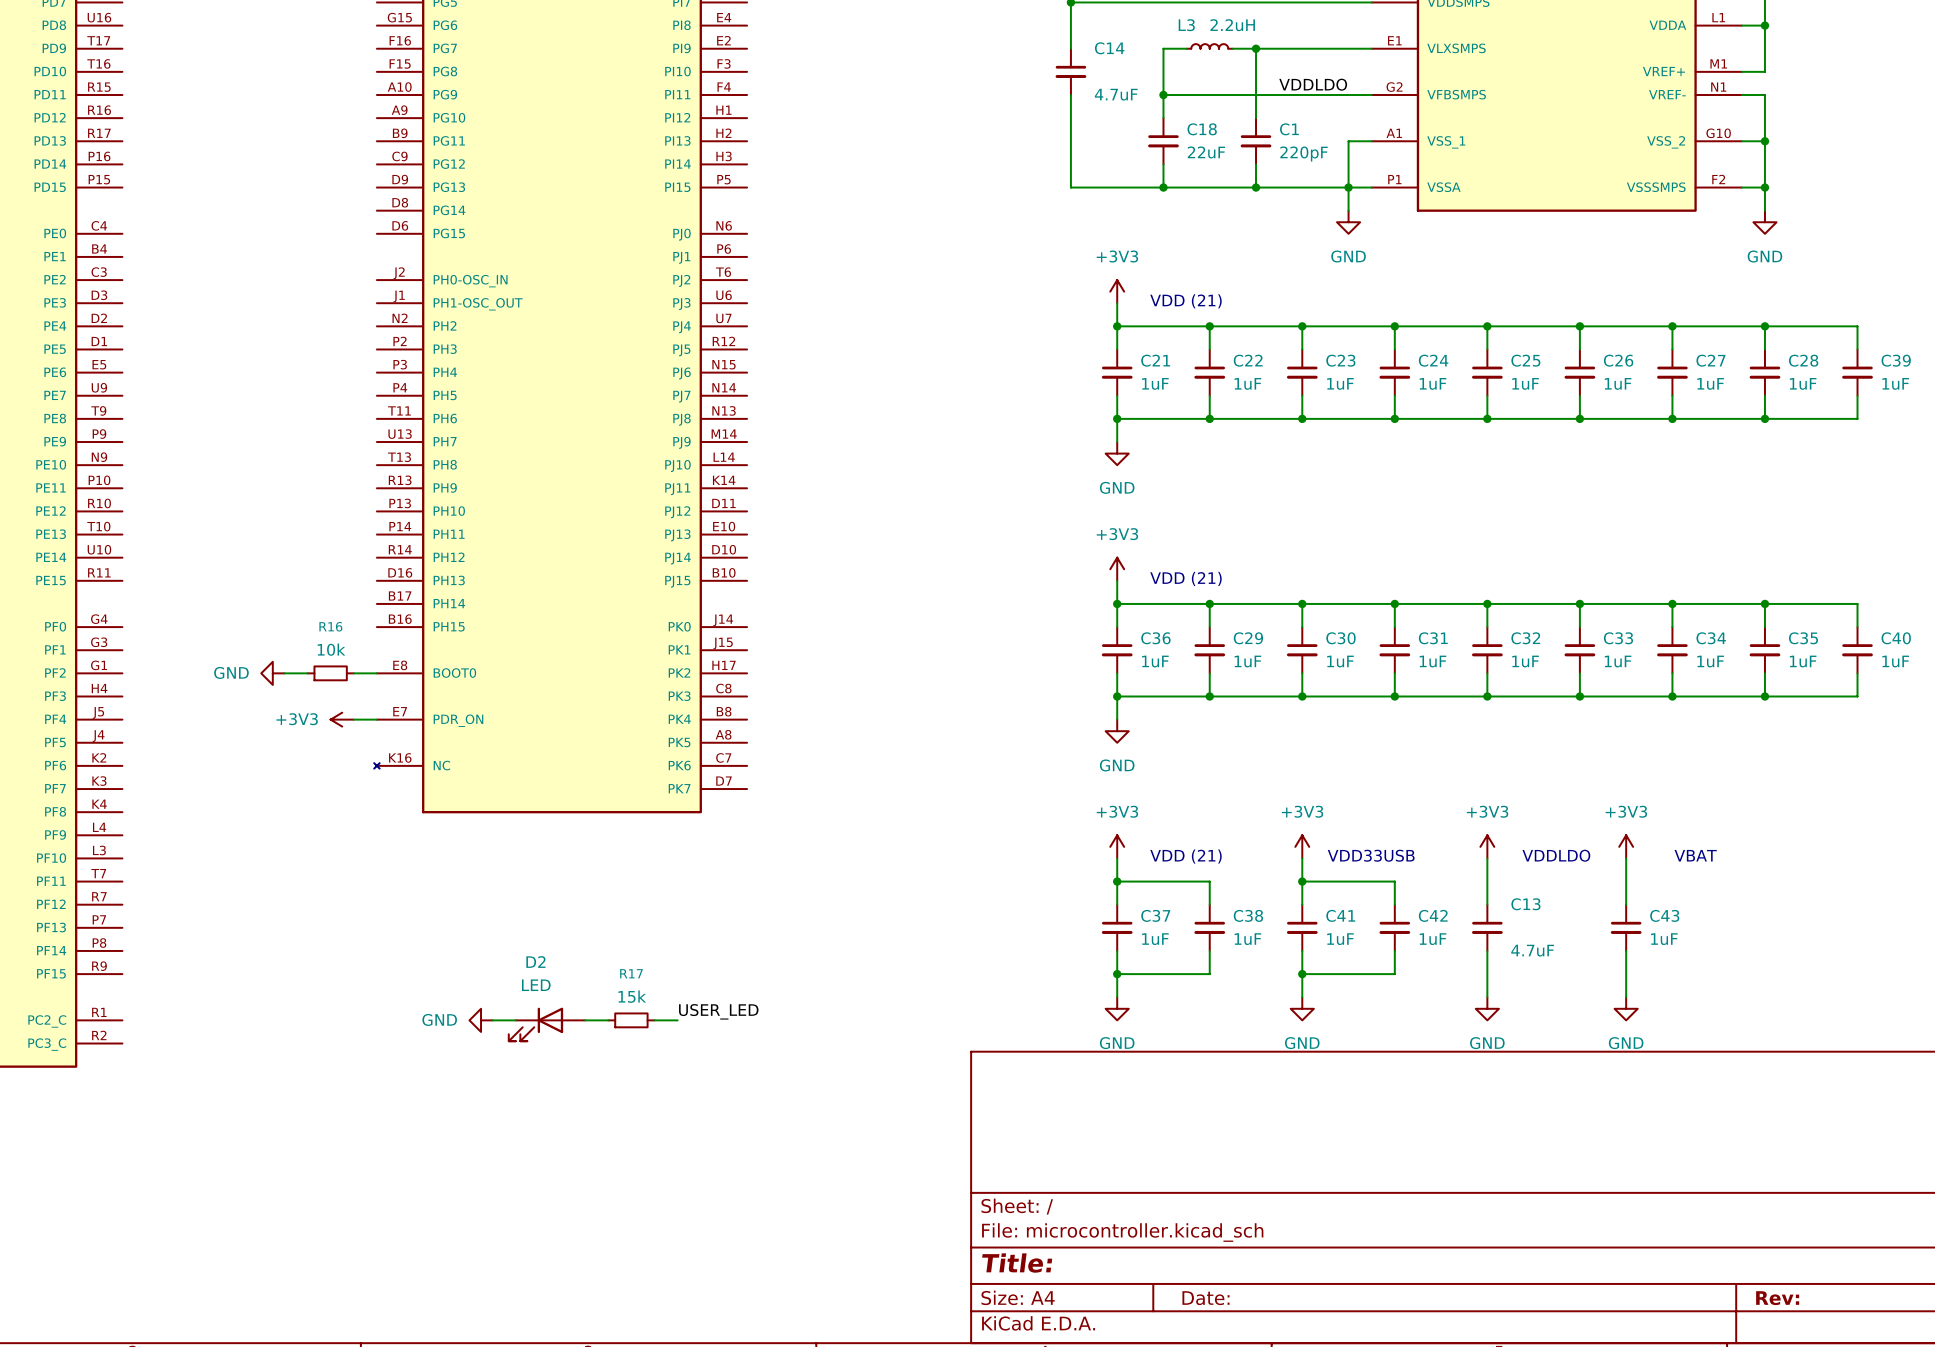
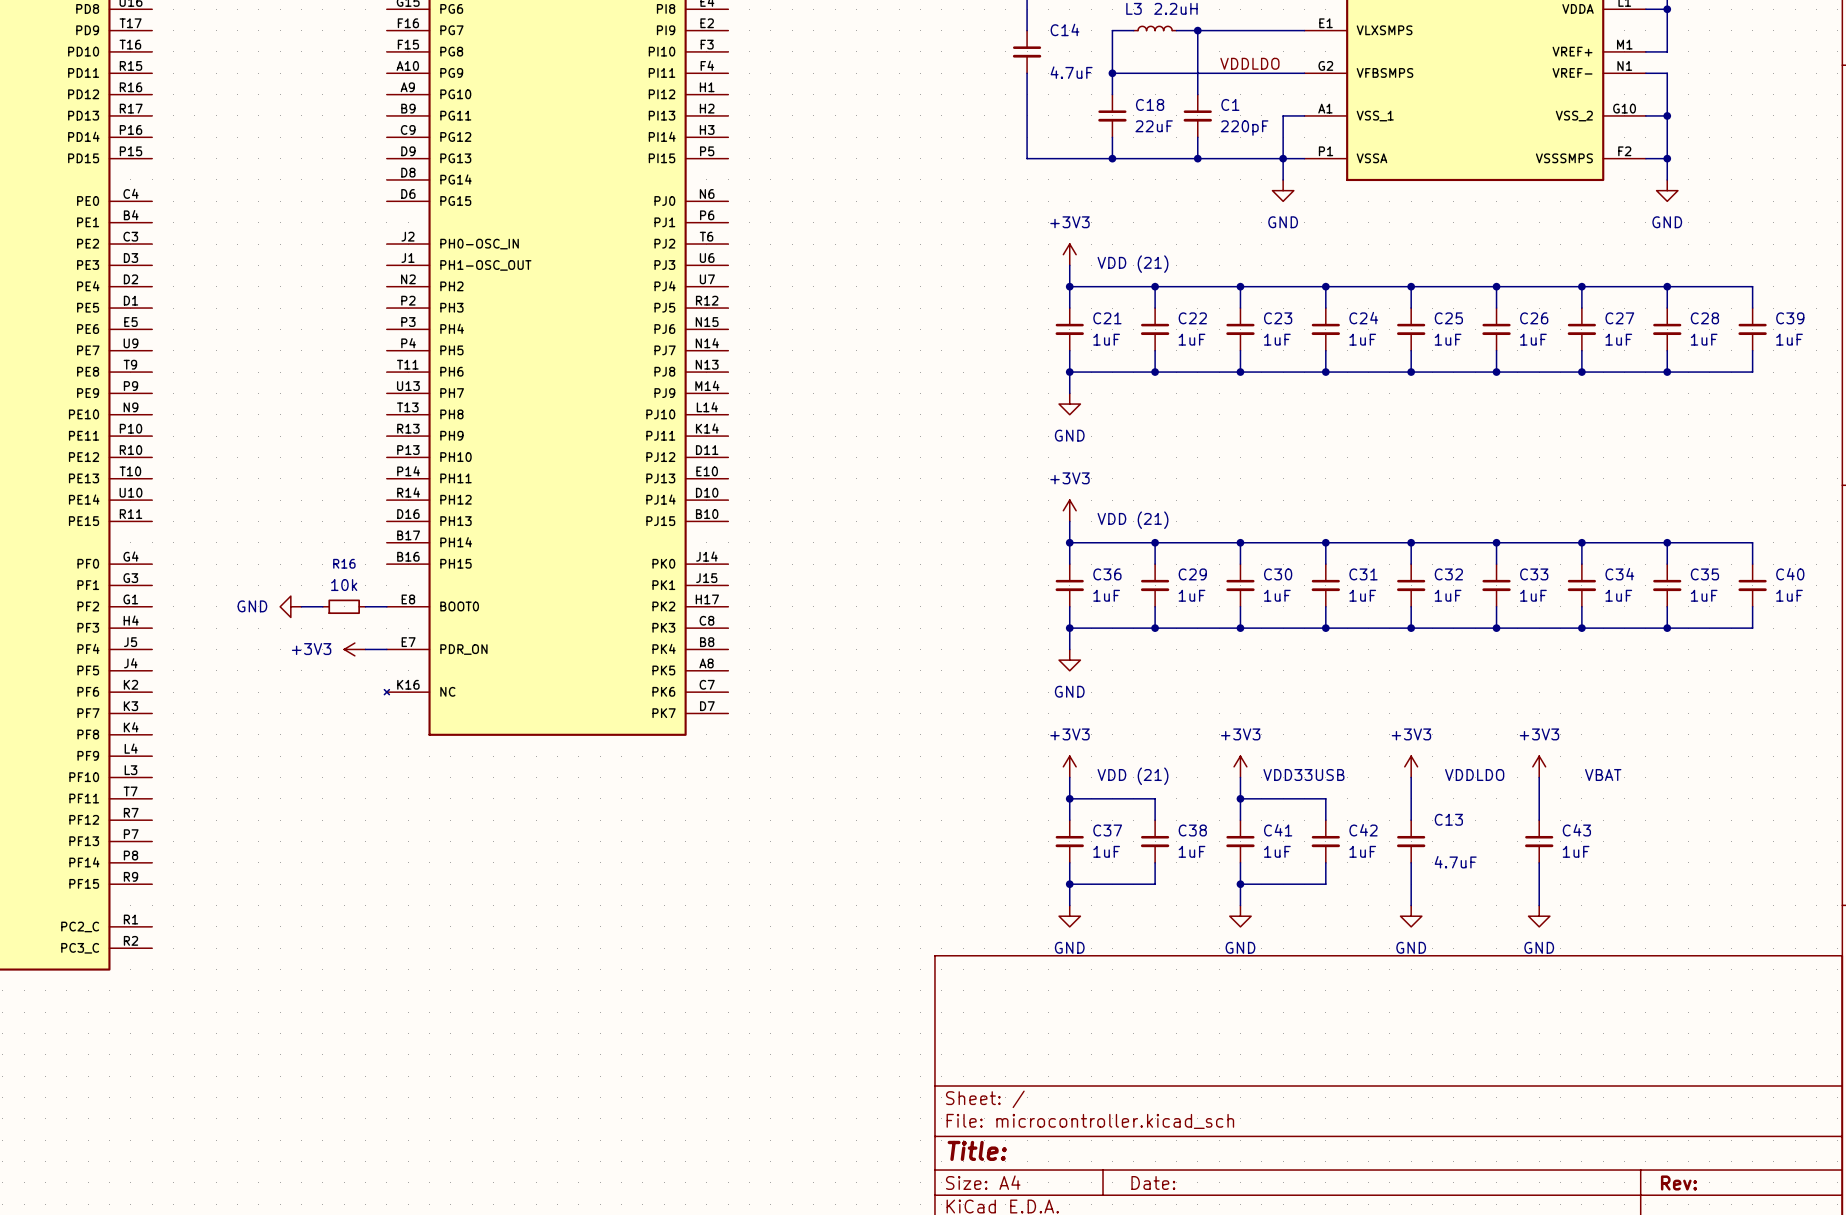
label: USER_LED (718, 1011) -> none
power symbol: GND (481, 1020) -> none
wire: (492, 1020) (515, 1020) -> none
wire: (585, 1020) (608, 1020) -> none
R17: 15k (631, 1020) -> none
wire: (654, 1020) (677, 1020) -> none
D2: LED (546, 1024) -> none

